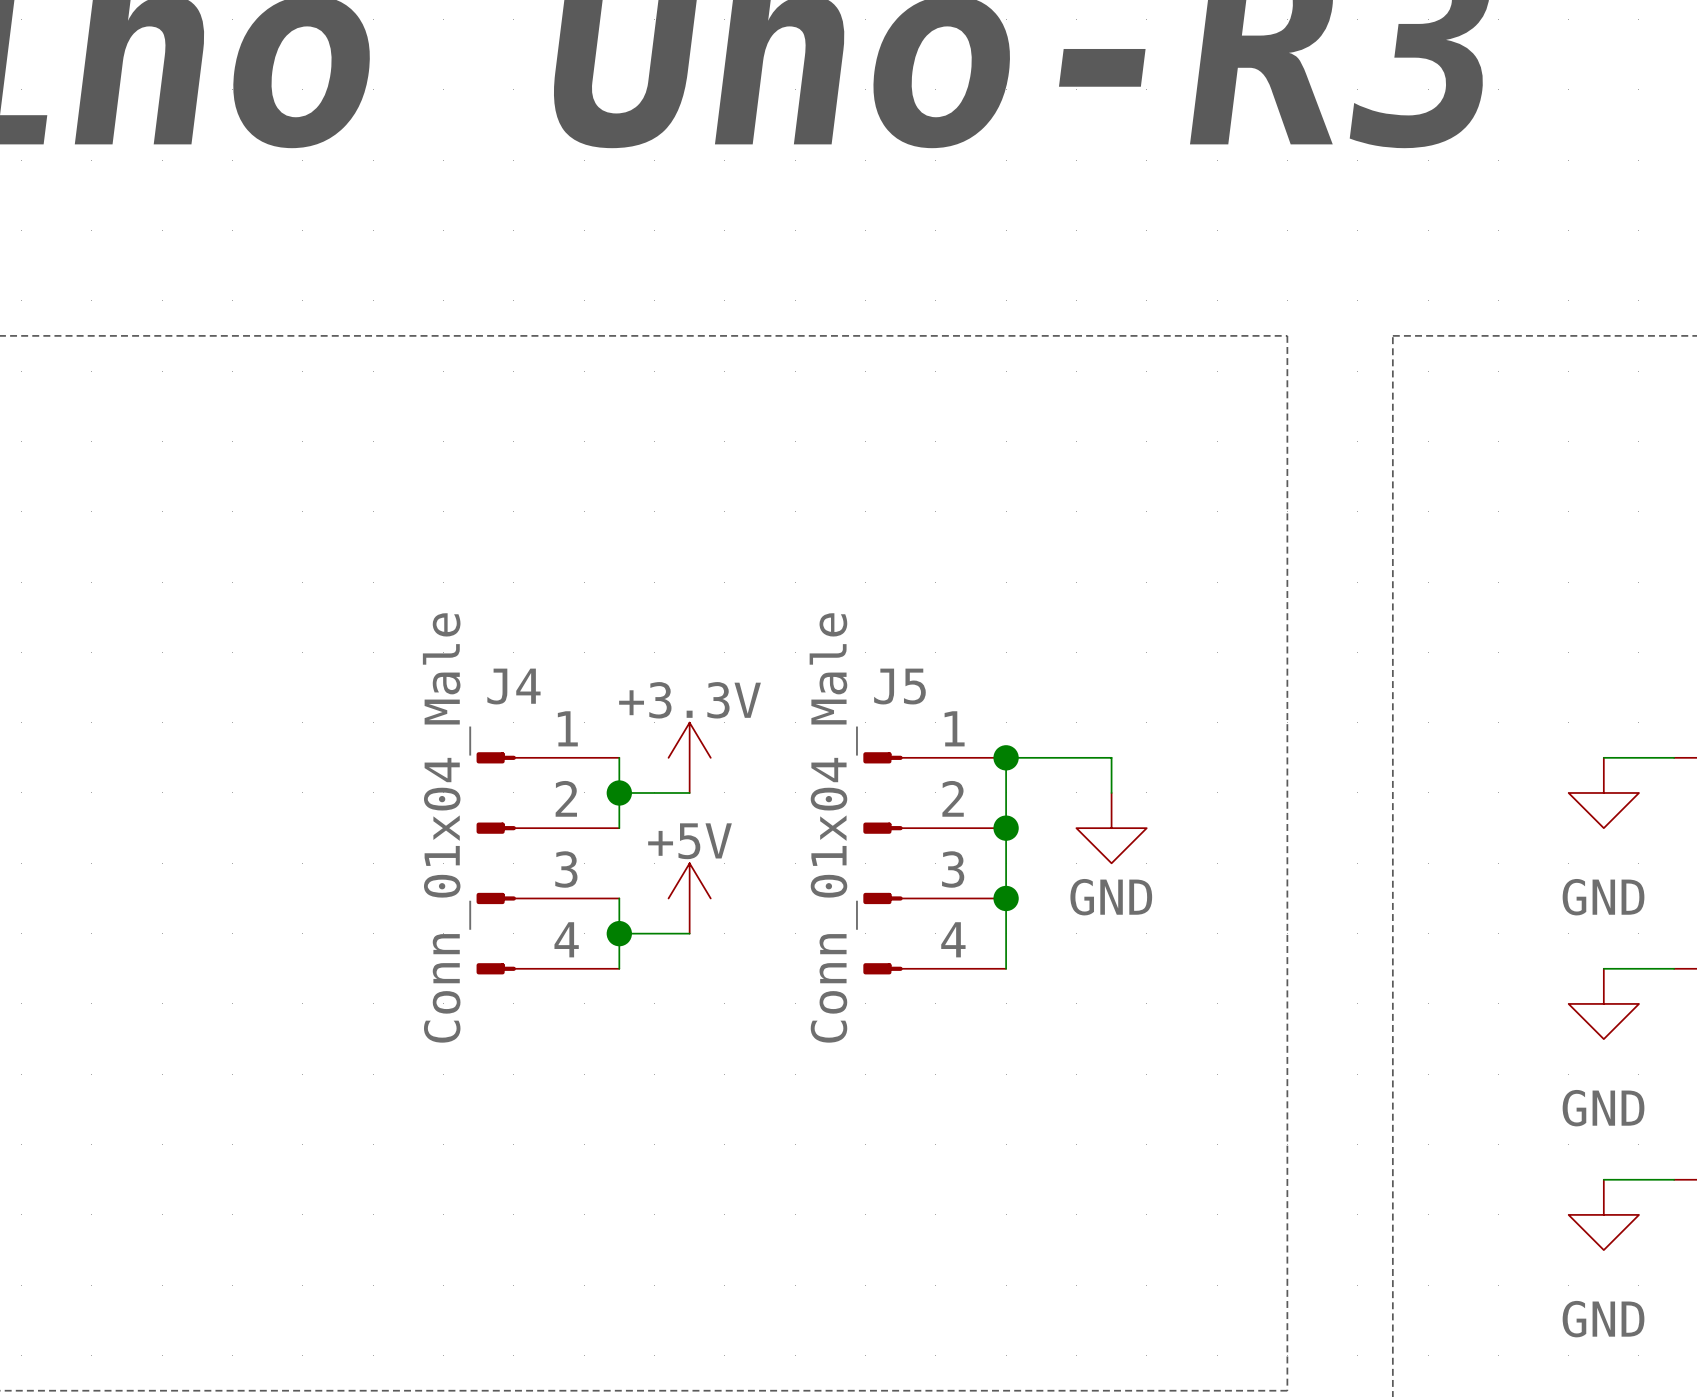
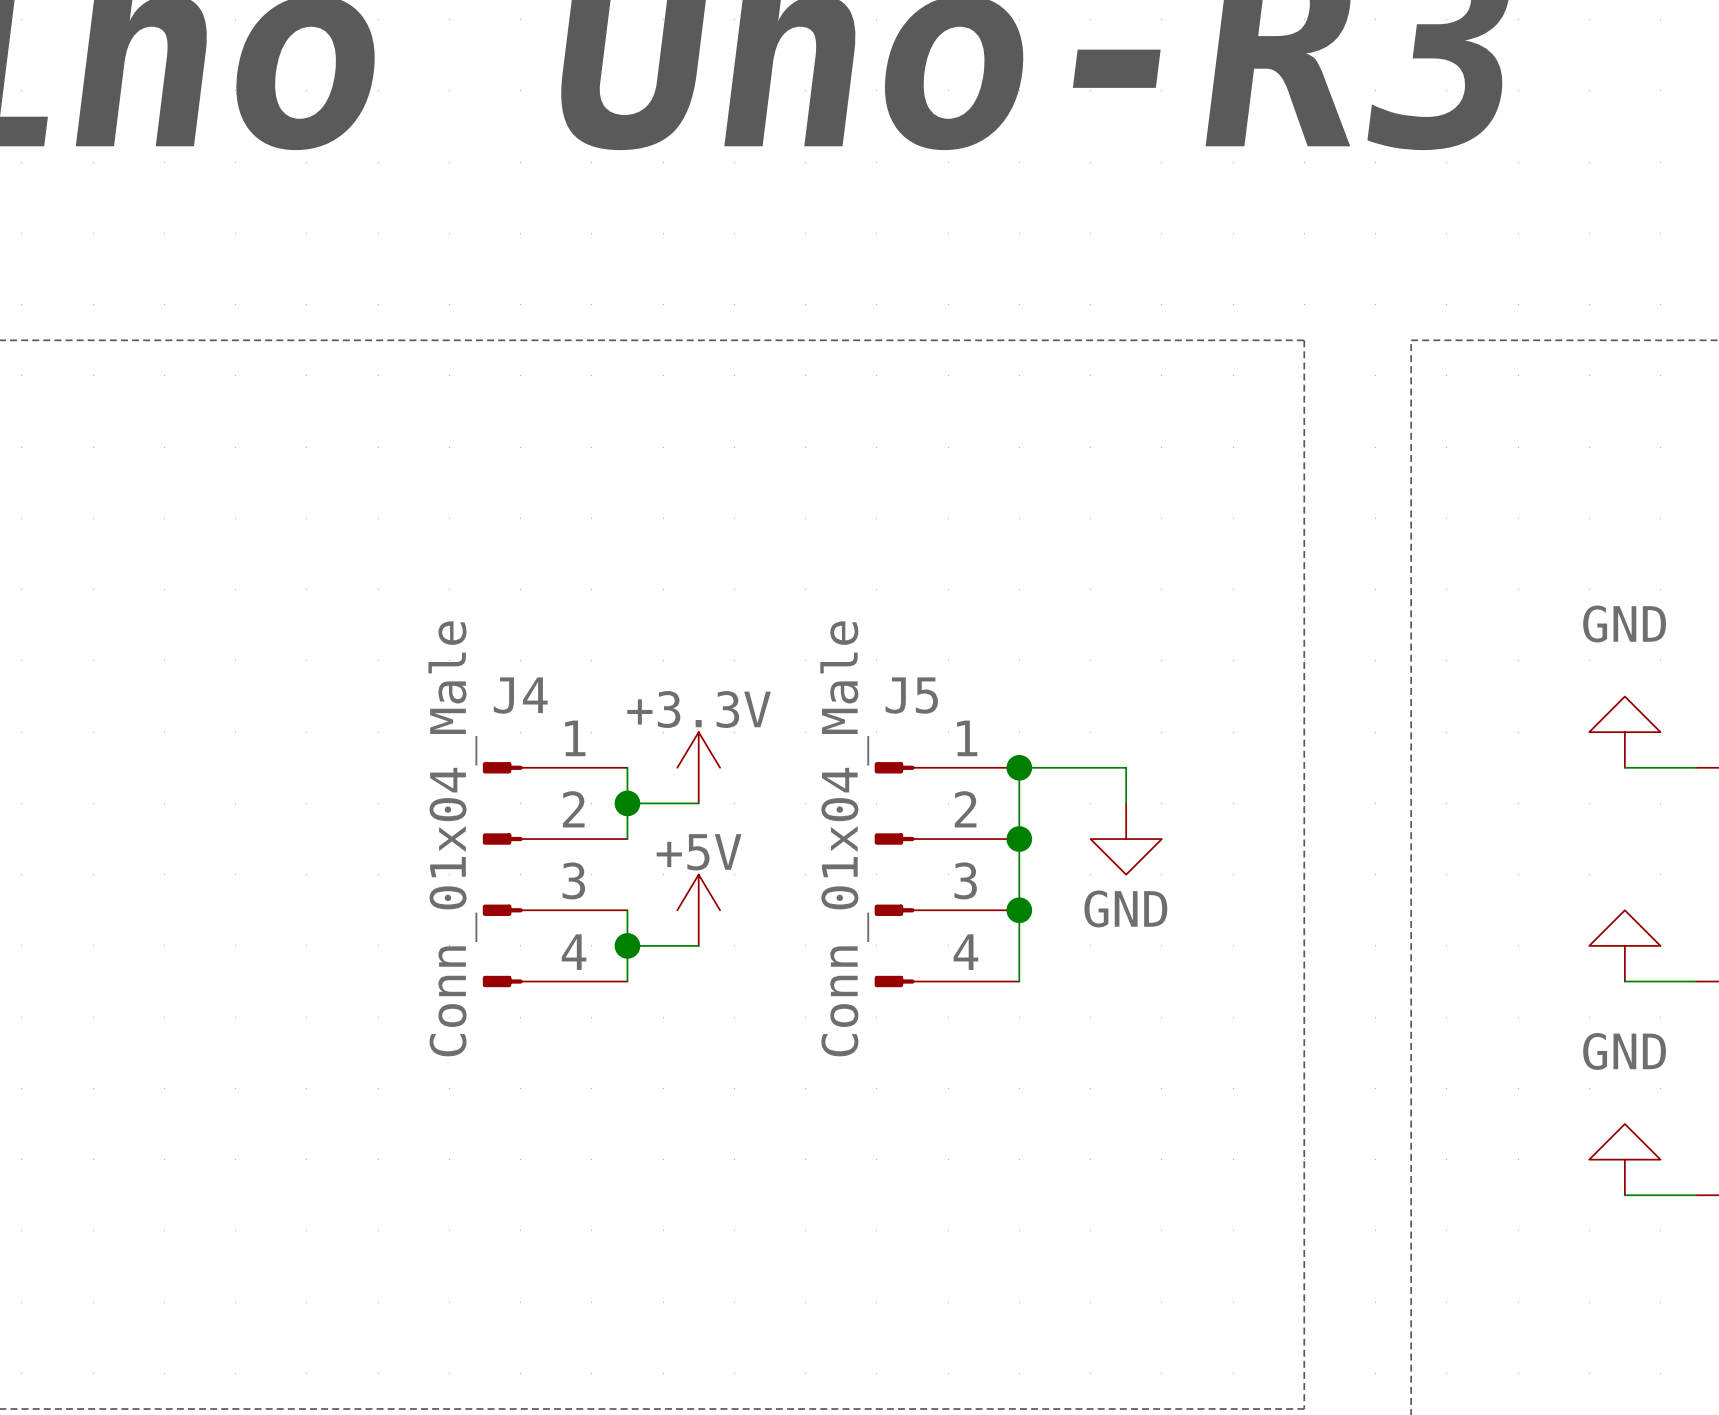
power symbol rotation: 0° (1603, 792) -> 180° (1624, 732)
power symbol position: GND (1603, 792) -> GND (1624, 732)
power symbol: none -> (1624, 945)
power symbol: GND (1603, 1003) -> none
power symbol: none -> GND (1624, 1159)
power symbol: GND (1603, 1214) -> none

